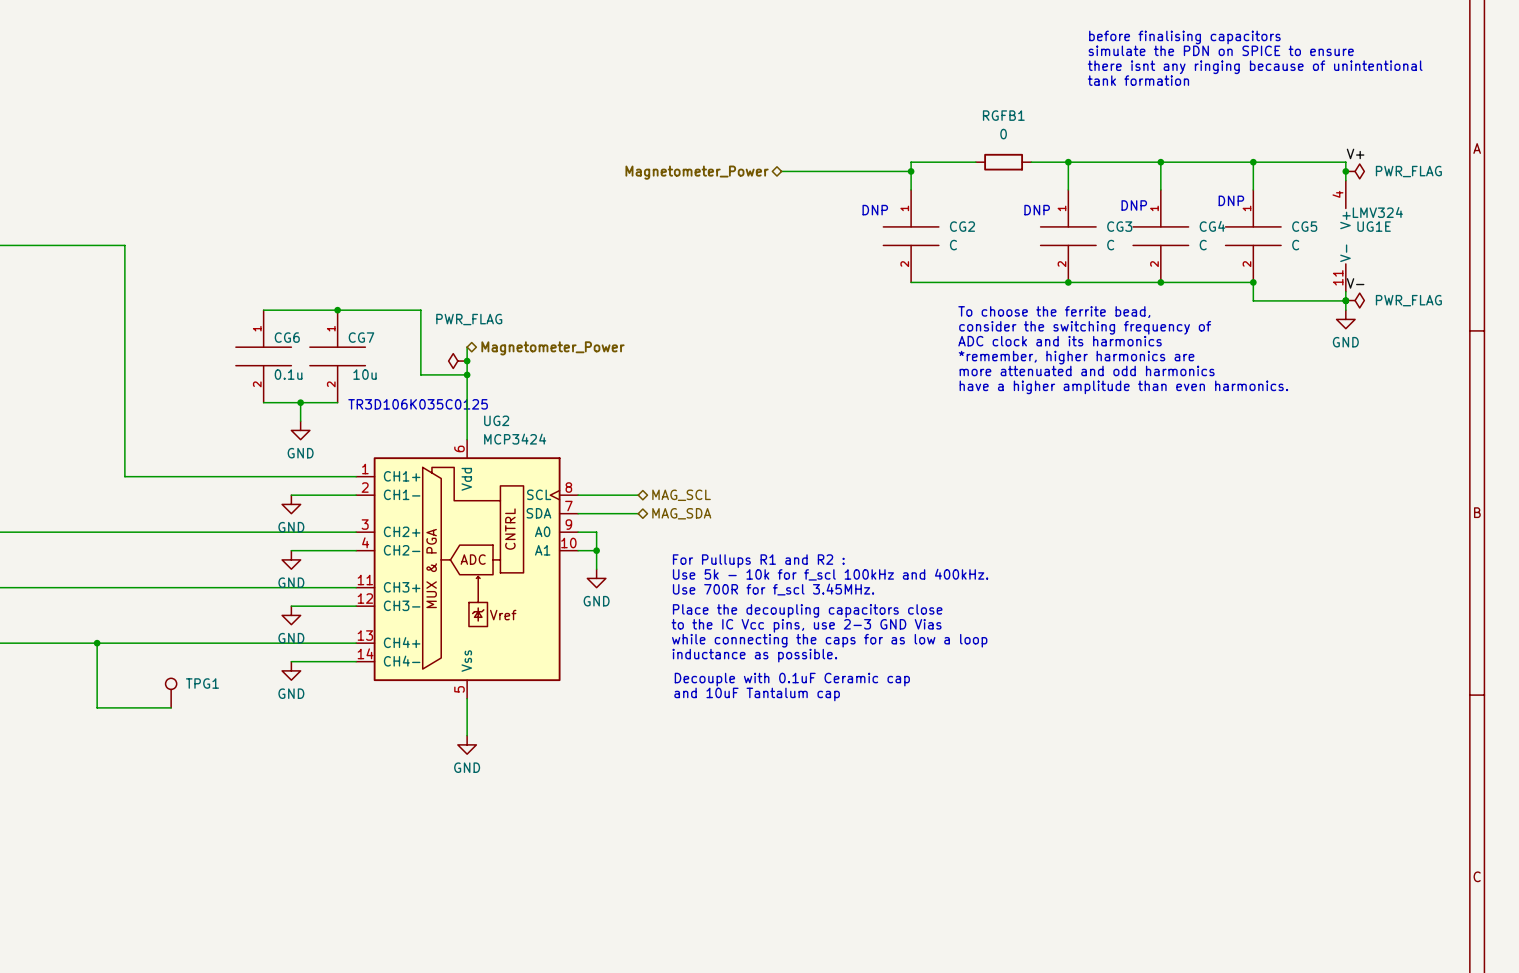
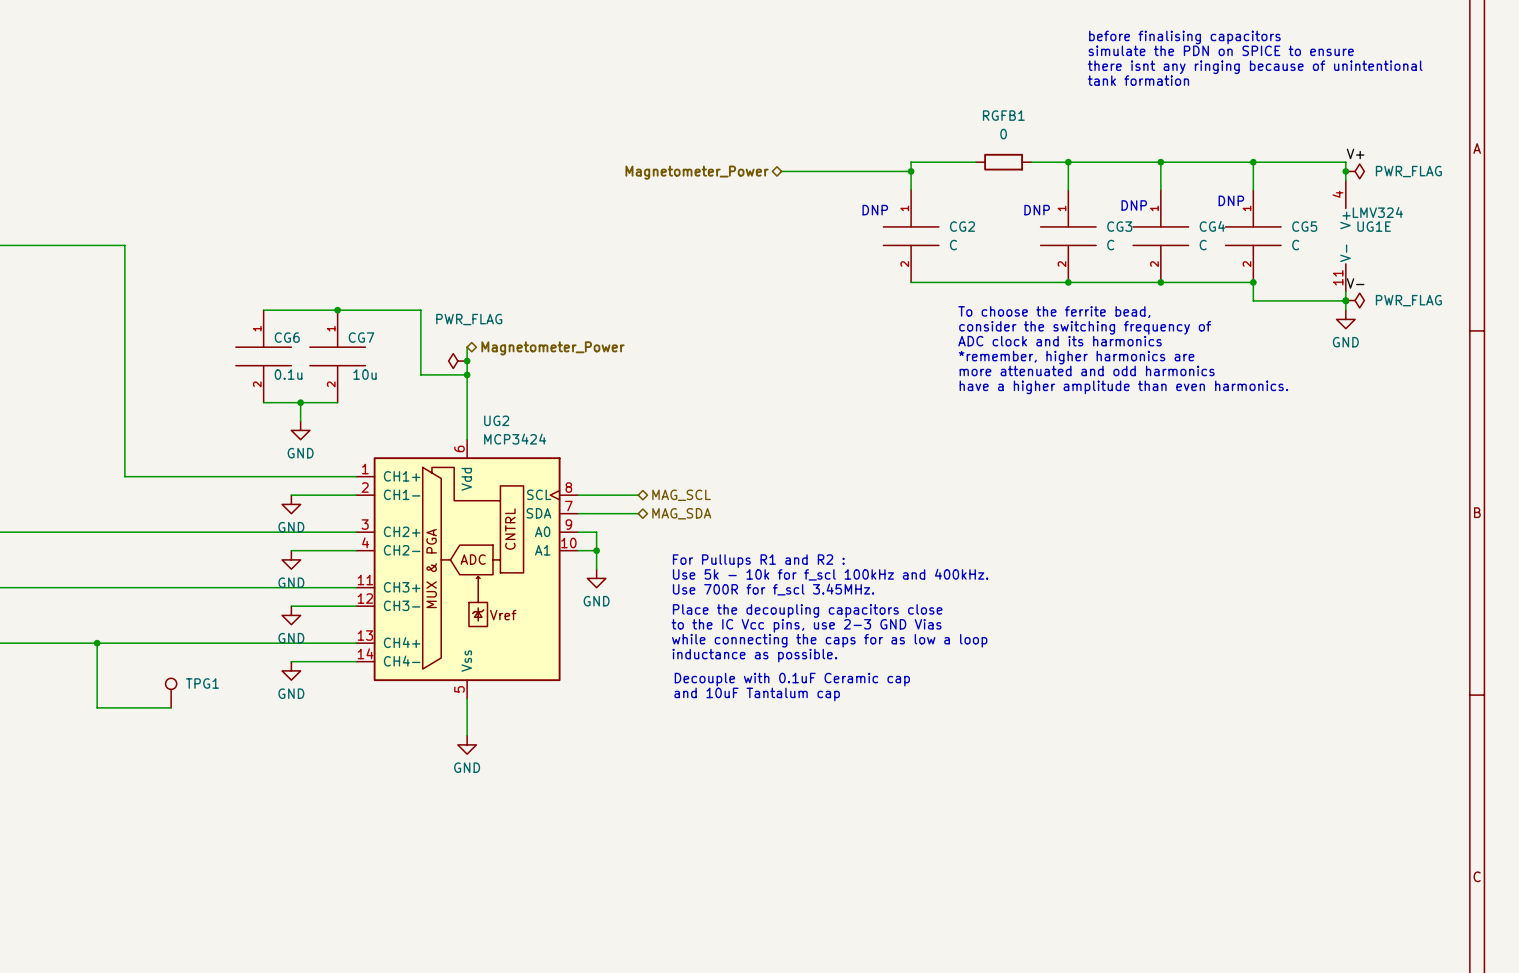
text: TR3D106K035C0125 (418, 404) -> none

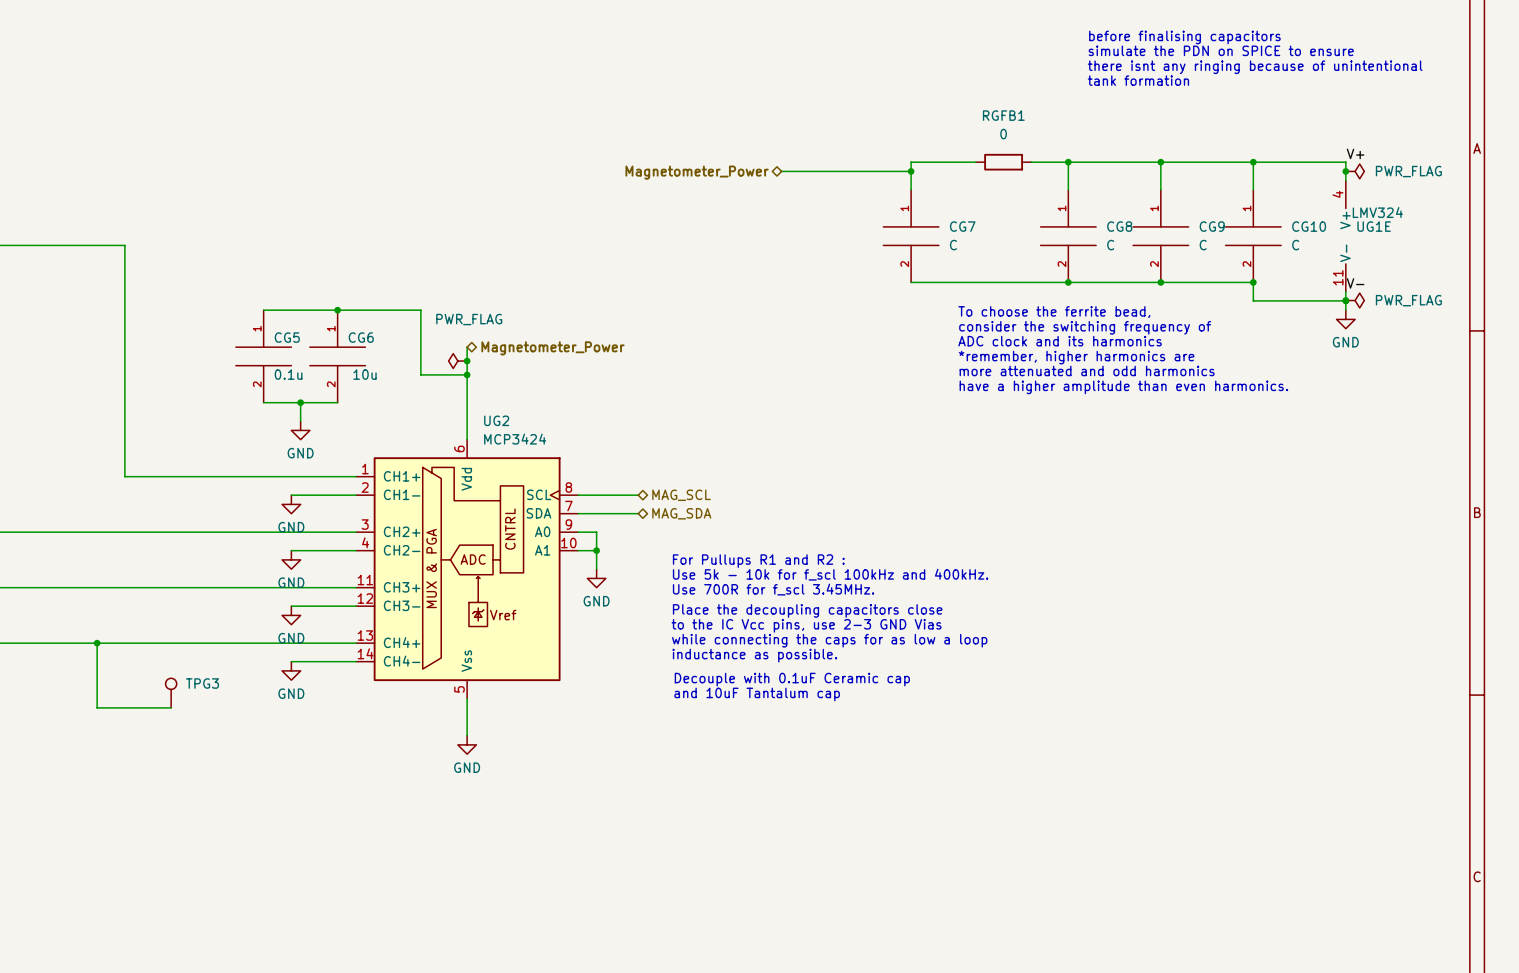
text: DNP (1231, 200) -> none
text: DNP (1134, 205) -> none
text: DNP (875, 210) -> none
text: DNP (1037, 210) -> none
CG2 name: CG2 (962, 226) -> CG7 (962, 226)
CG3 name: CG3 (1119, 226) -> CG8 (1119, 226)
CG4 name: CG4 (1212, 226) -> CG9 (1212, 226)
CG5 name: CG5 (1304, 226) -> CG10 (1309, 226)
CG6 name: CG6 (287, 337) -> CG5 (287, 337)
CG7 name: CG7 (361, 337) -> CG6 (361, 337)
TPG1 name: TPG1 (202, 683) -> TPG3 (202, 683)

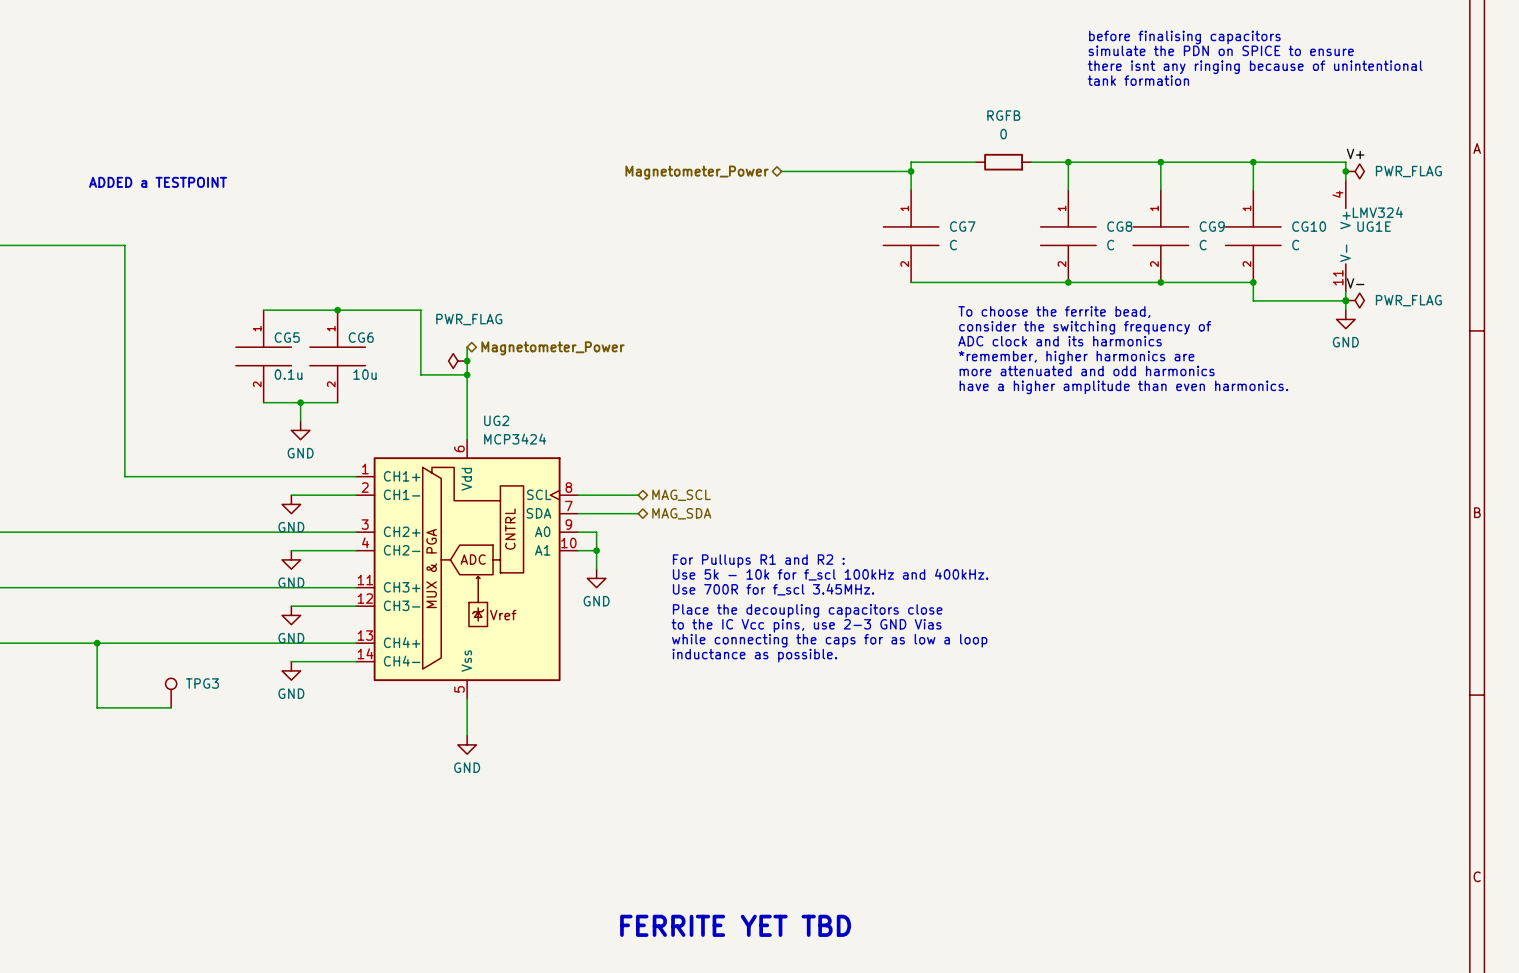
RGFB1 name: RGFB1 (1003, 115) -> RGFB (1003, 115)
text: none -> ADDED a TESTPOINT (158, 182)
text: Decouple with 0.1uF Ceramic cap (792, 679) -> none
text: and 10uF Tantalum cap (757, 694) -> none
text: none -> FERRITE YET TBD (735, 925)

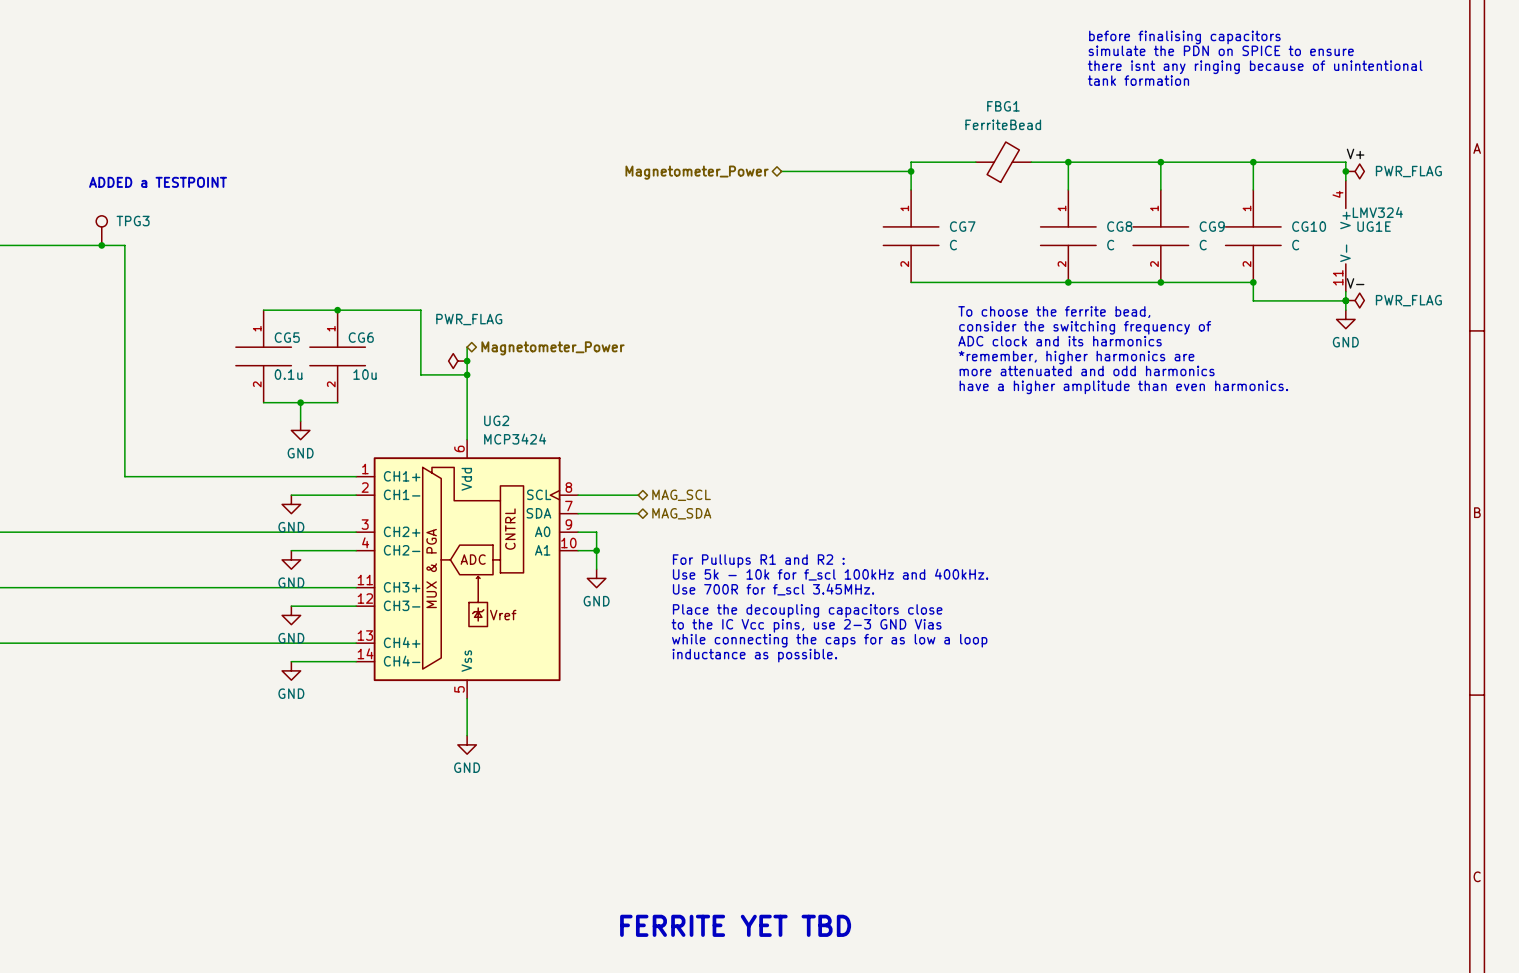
RGFB: 0 (1003, 162) -> none
FBG1: none -> FerriteBead (1003, 162)
junction: none -> (101, 245)
wire: (97, 643) (97, 707) (171, 707) -> none
junction: (97, 643) -> none
TPG3 position: (171, 693) -> (101, 230)

